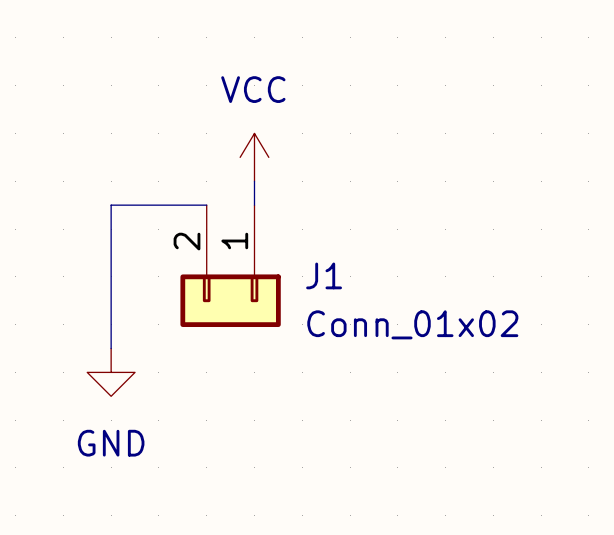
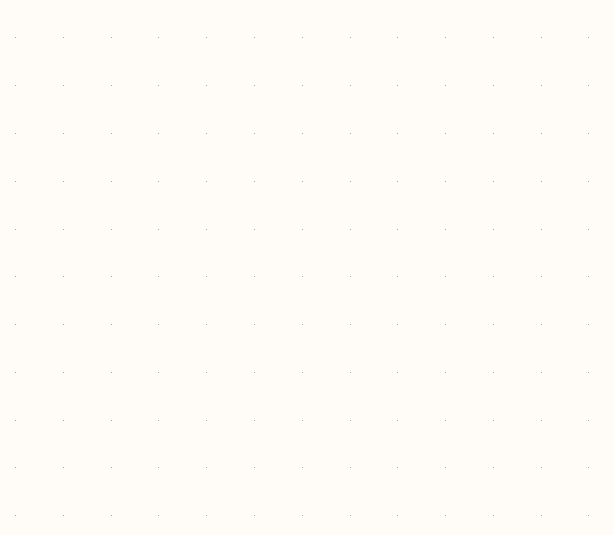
power symbol: VCC (254, 157) -> none
wire: (254, 181) (254, 205) -> none
wire: (206, 205) (111, 205) (111, 348) -> none
J1: Conn_01x02 (230, 266) -> none
power symbol: GND (111, 372) -> none

